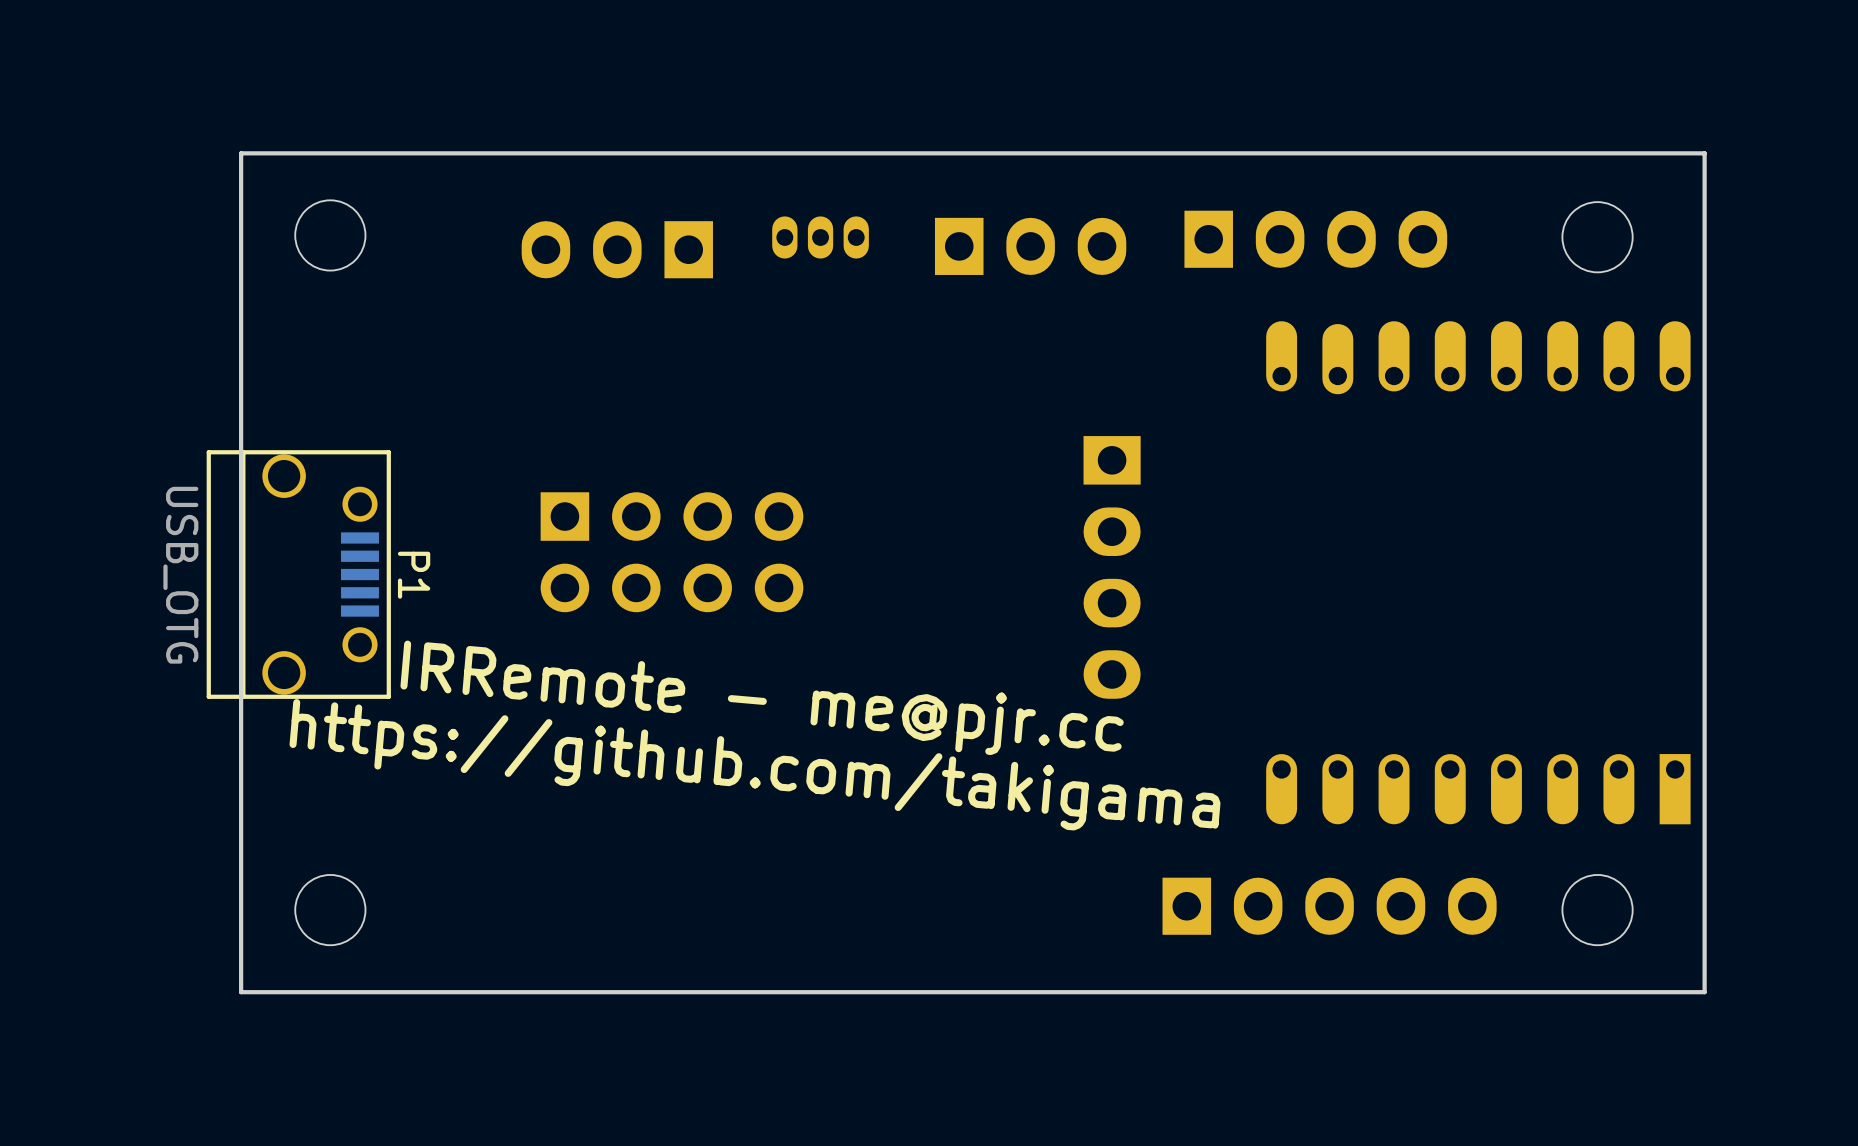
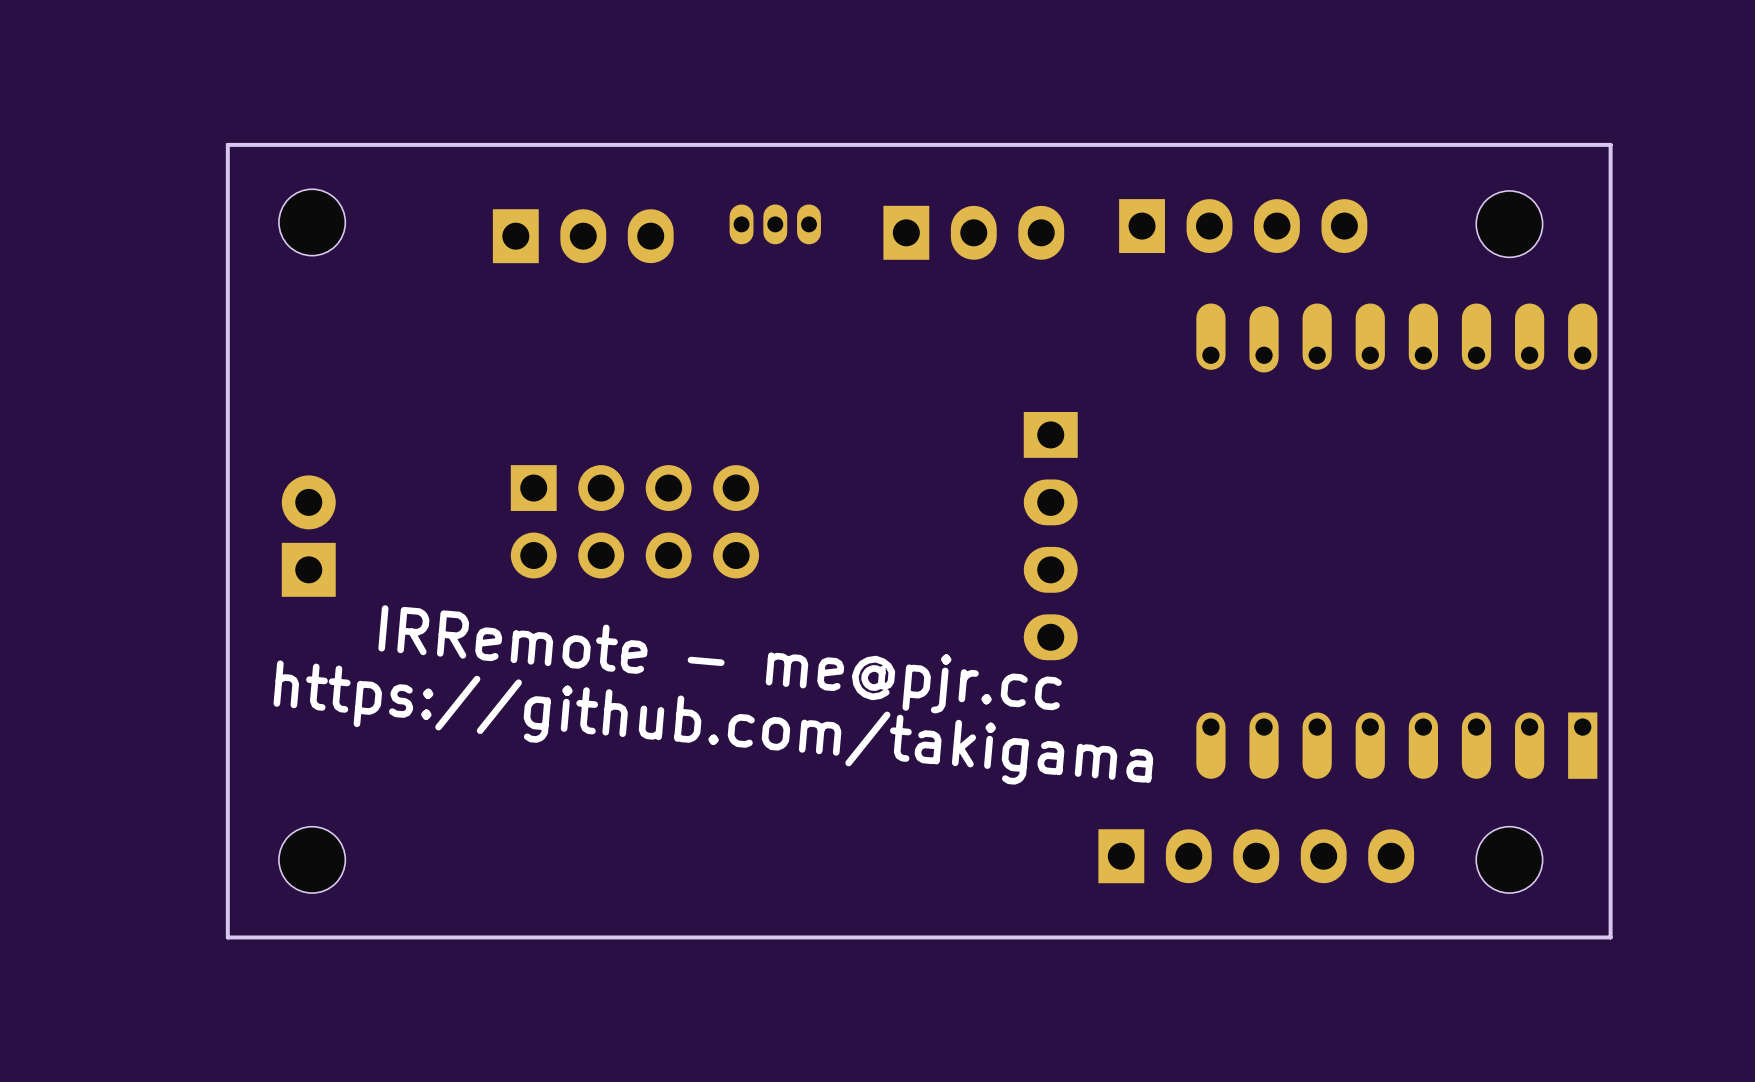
part rotation: 0° (617, 249) -> 180° (583, 236)
part: none -> (308, 536)
P1: USB_OTG (298, 574) -> none

